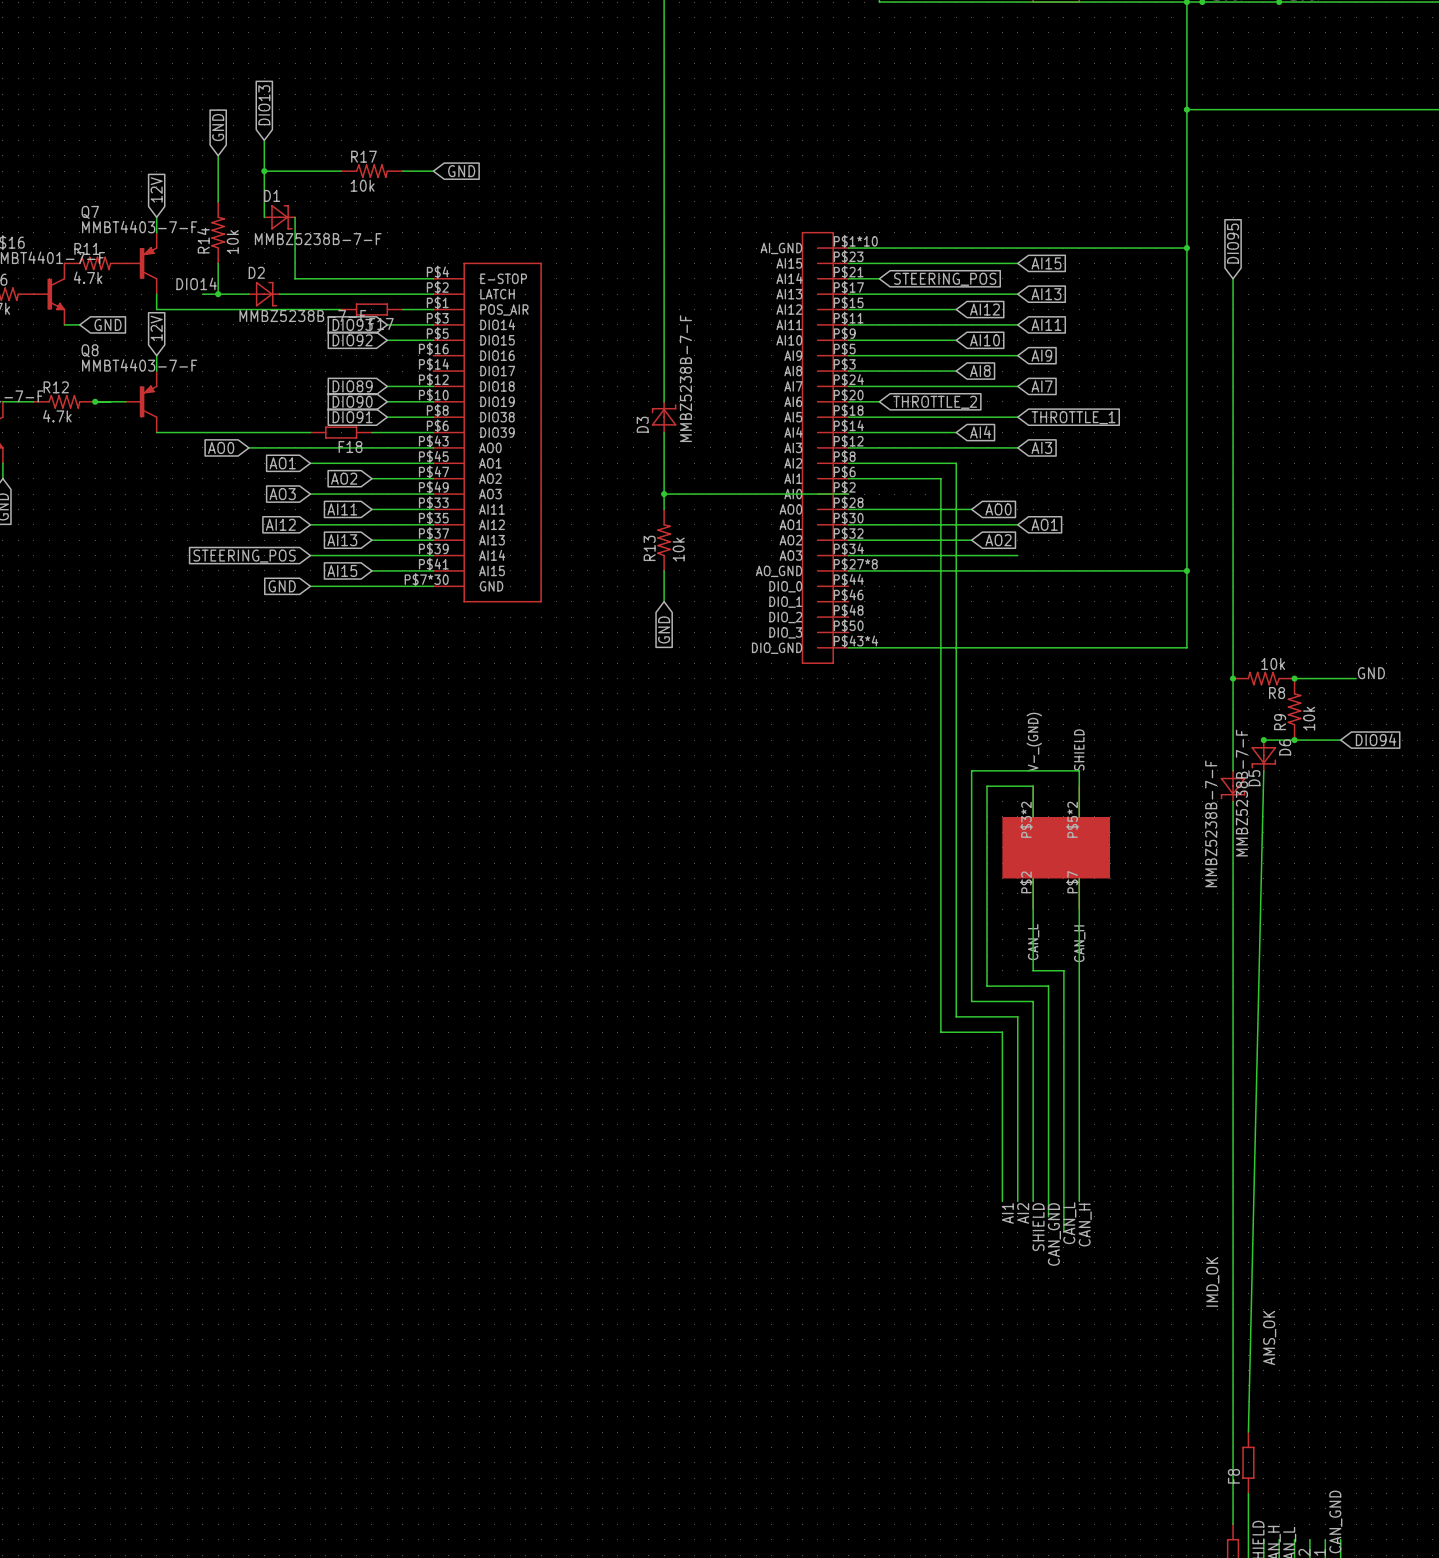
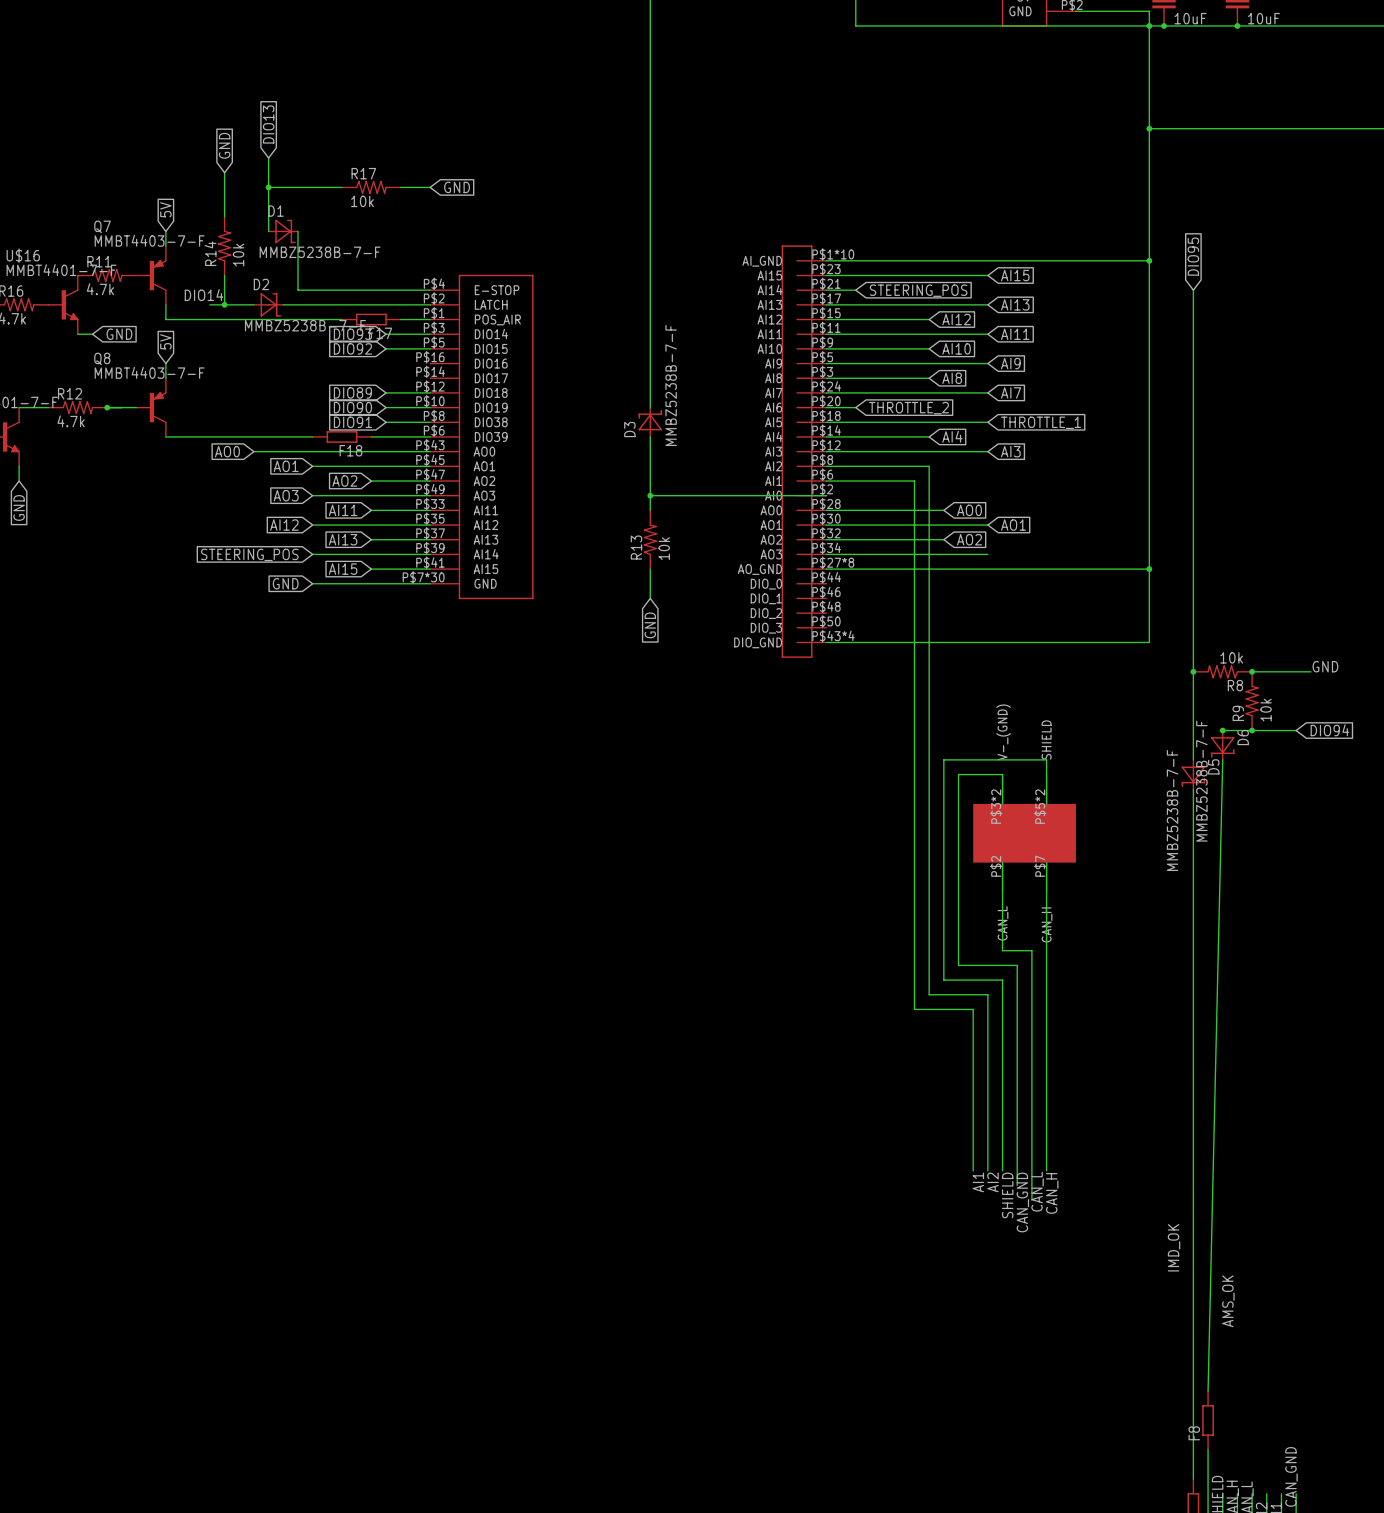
global label: 12V (156, 189) -> 5V (165, 209)
global label: 12V (156, 328) -> 5V (165, 341)

